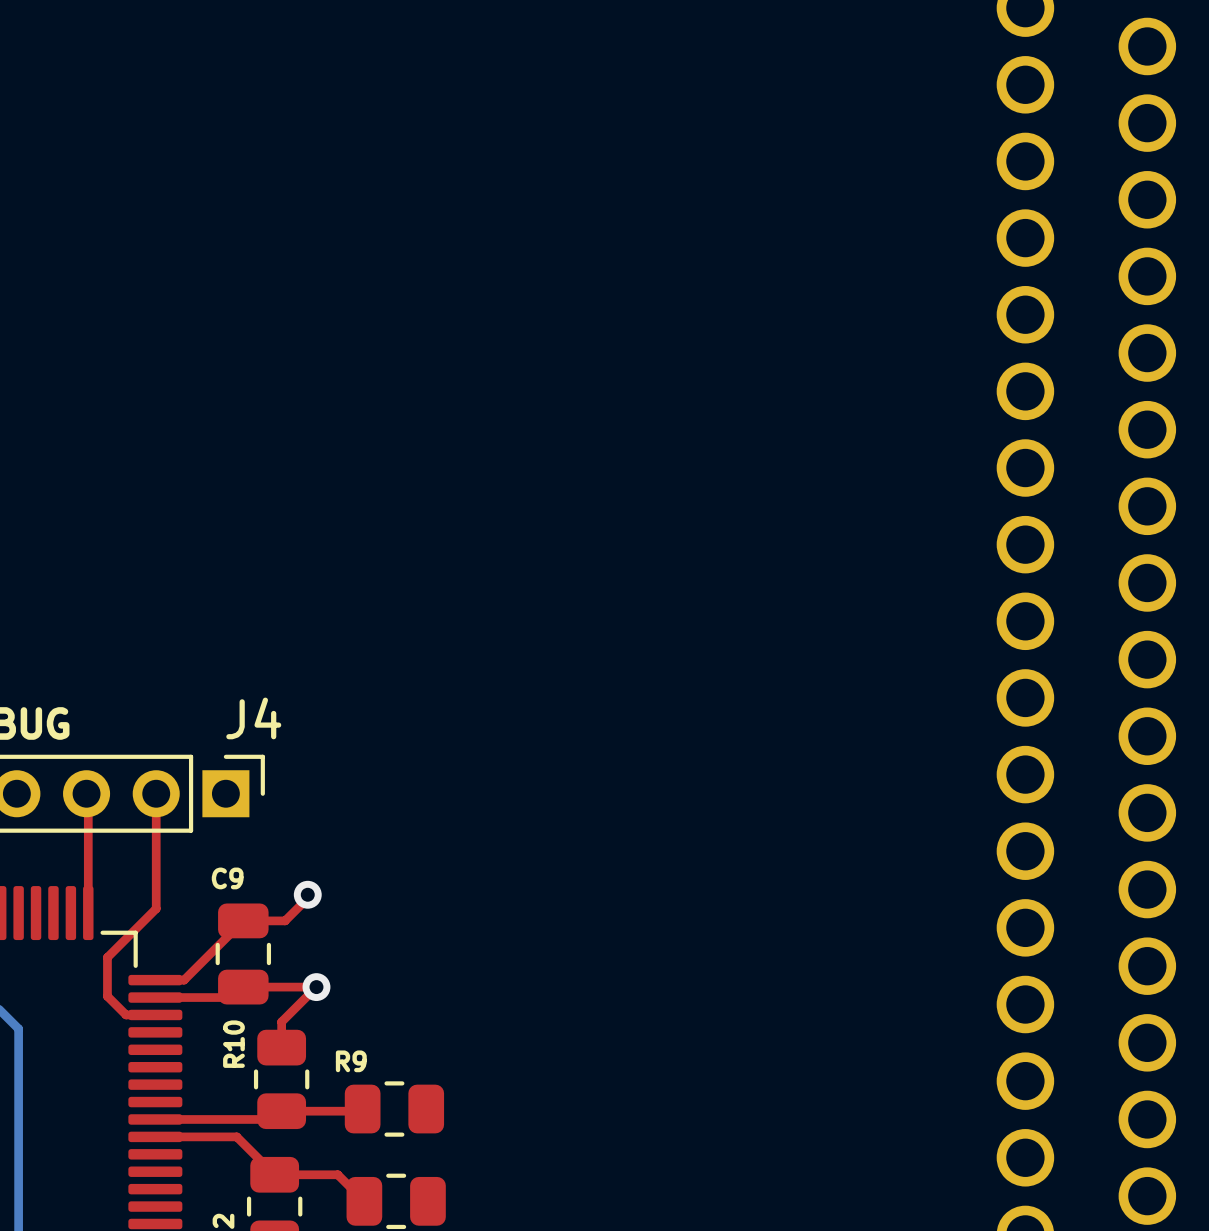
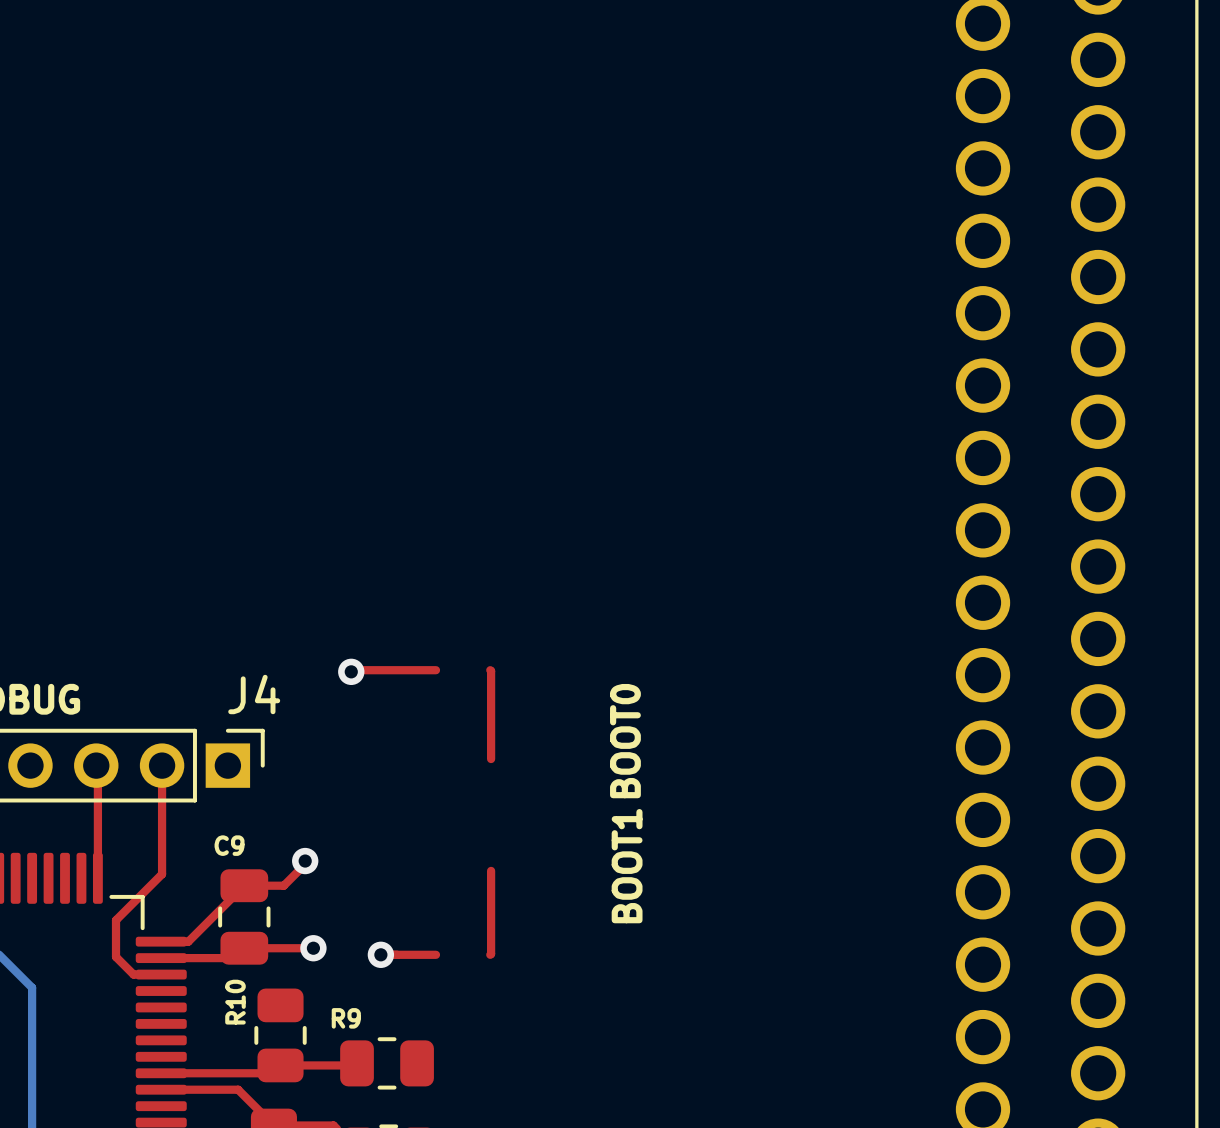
top track: none -> (435, 670) (352, 670) (351, 671)
top track: none -> (490, 670) (491, 759)
via: none -> (351, 671)
text: none -> BOOT0 (625, 741)
text: none -> BOOT1 (627, 866)
top track: none -> (491, 870) (490, 954)
top track: (316, 987) (281, 1021) (281, 1047) -> none
top track: none -> (380, 954) (435, 954)
via: none -> (380, 954)

